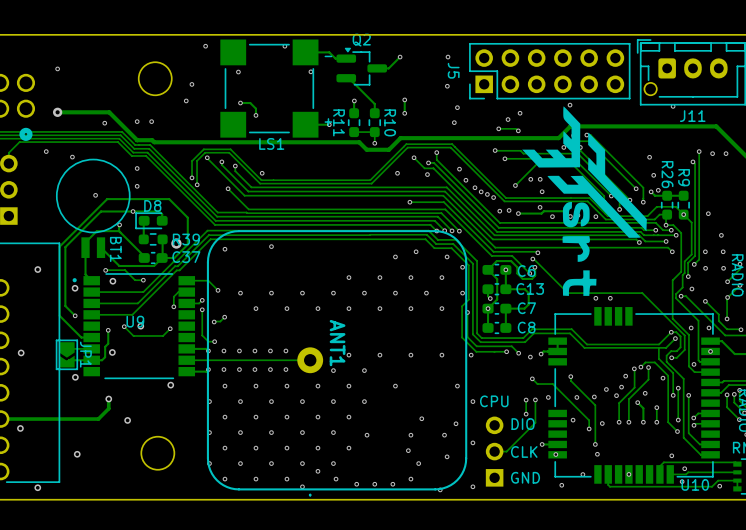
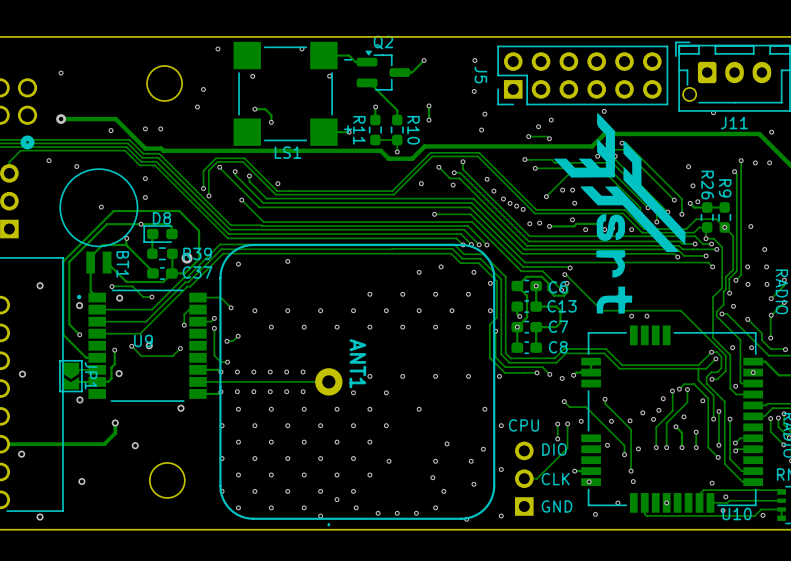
via: none -> (771, 132)

